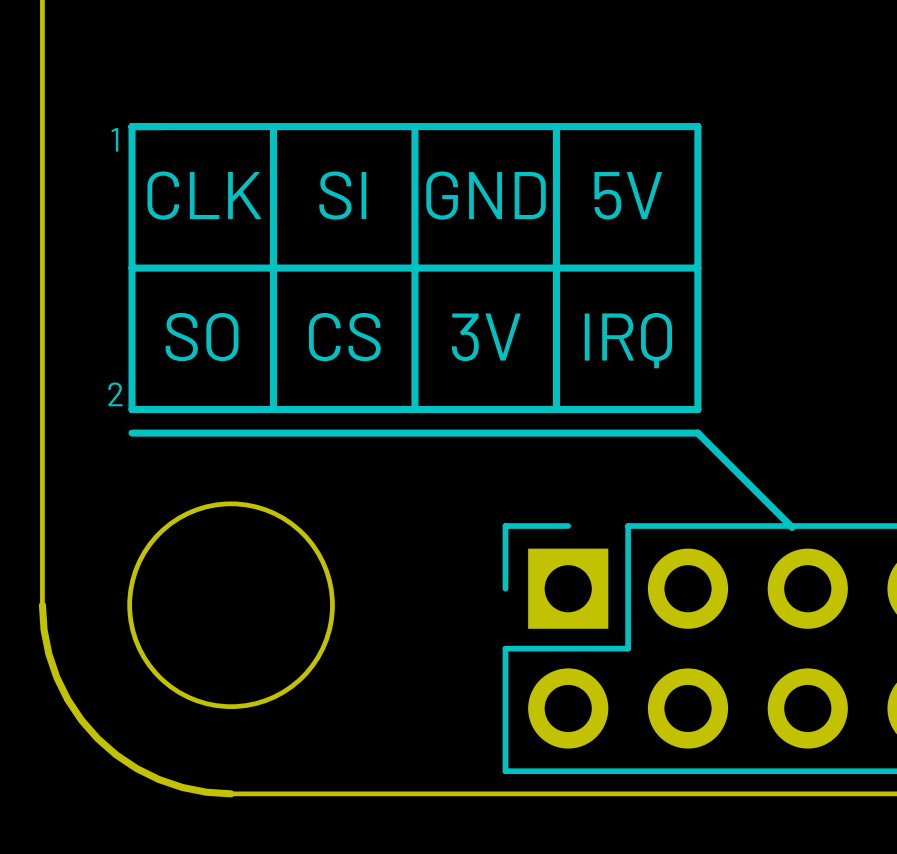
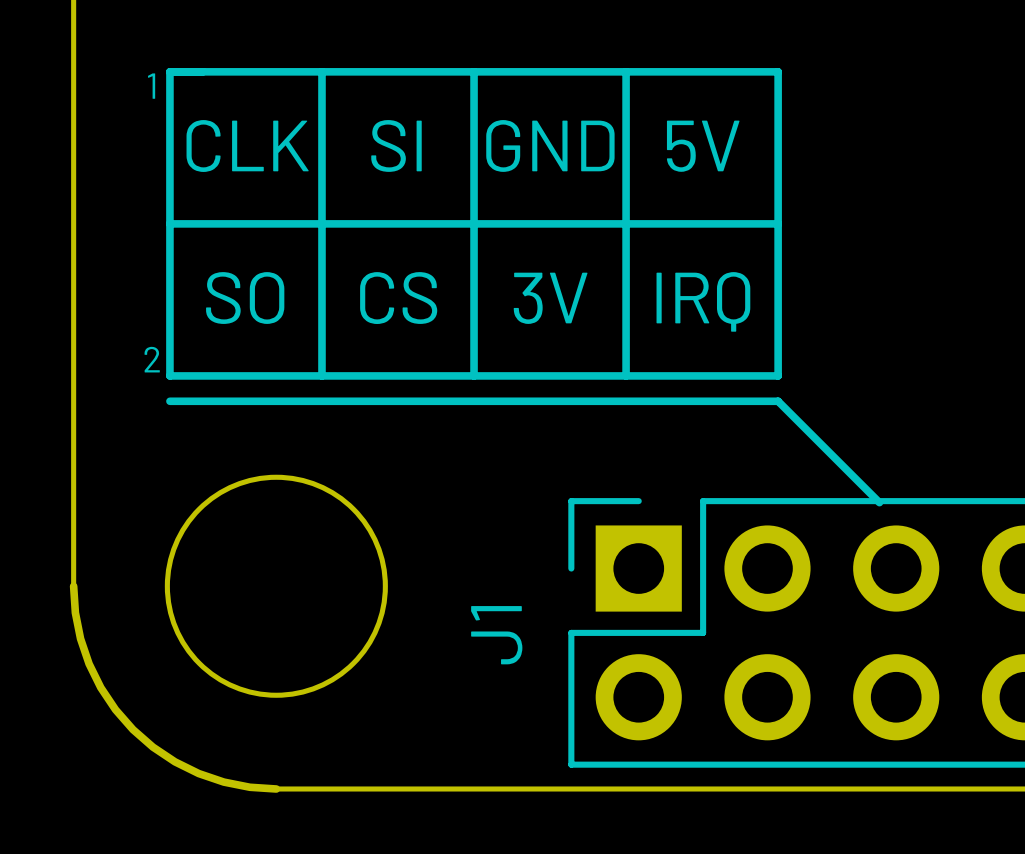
J1 name: none -> J1 (496, 635)

